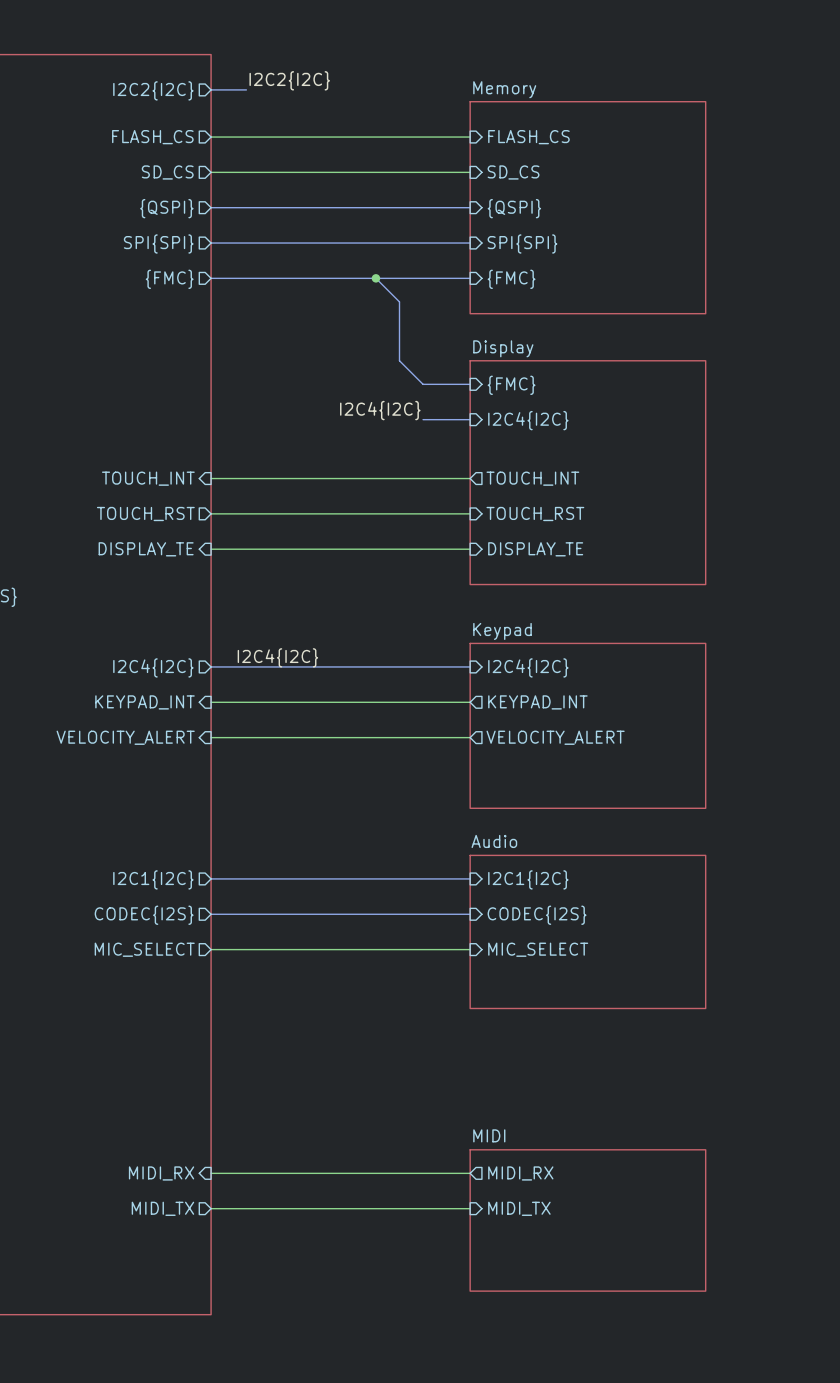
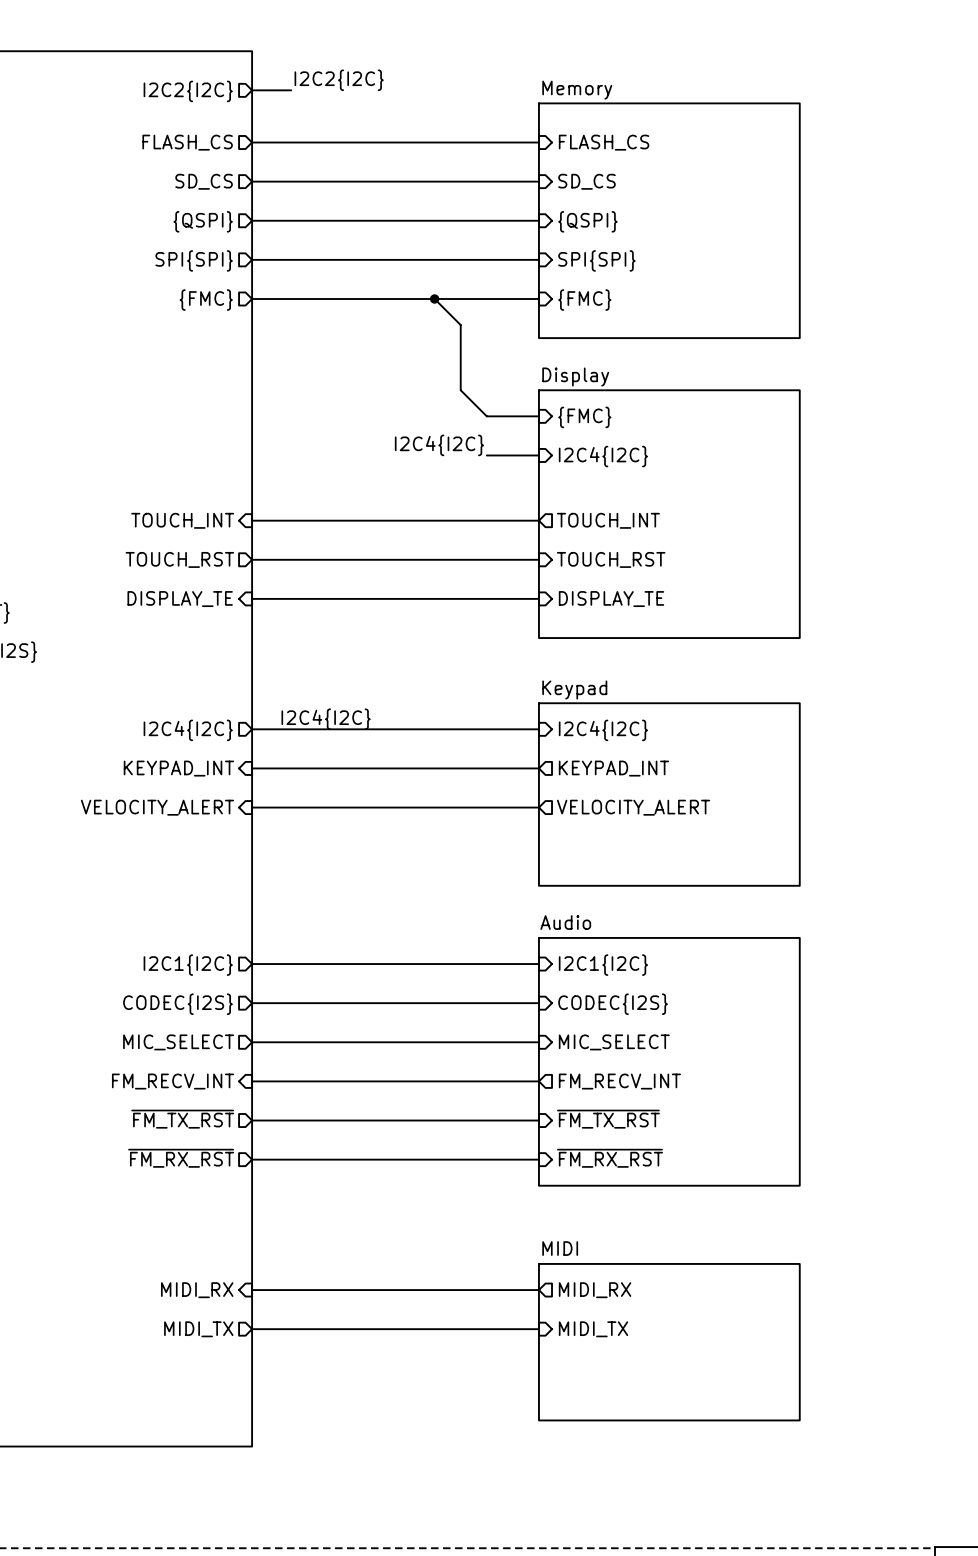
sheet Audio: (587, 931) -> none
sheet Audio: none -> (669, 1061)
wire: none -> (252, 1081) (538, 1081)
sheet pin: none -> FM_RECV_INT (173, 1081)
sheet pin: none -> FM_RECV_INT (619, 1081)
sheet pin: none -> ~{FM_TX_RST} (182, 1119)
sheet pin: none -> ~{FM_TX_RST} (608, 1119)
wire: none -> (252, 1120) (538, 1120)
sheet pin: none -> ~{FM_RX_RST} (181, 1158)
sheet pin: none -> ~{FM_RX_RST} (609, 1158)
wire: none -> (252, 1159) (538, 1159)

